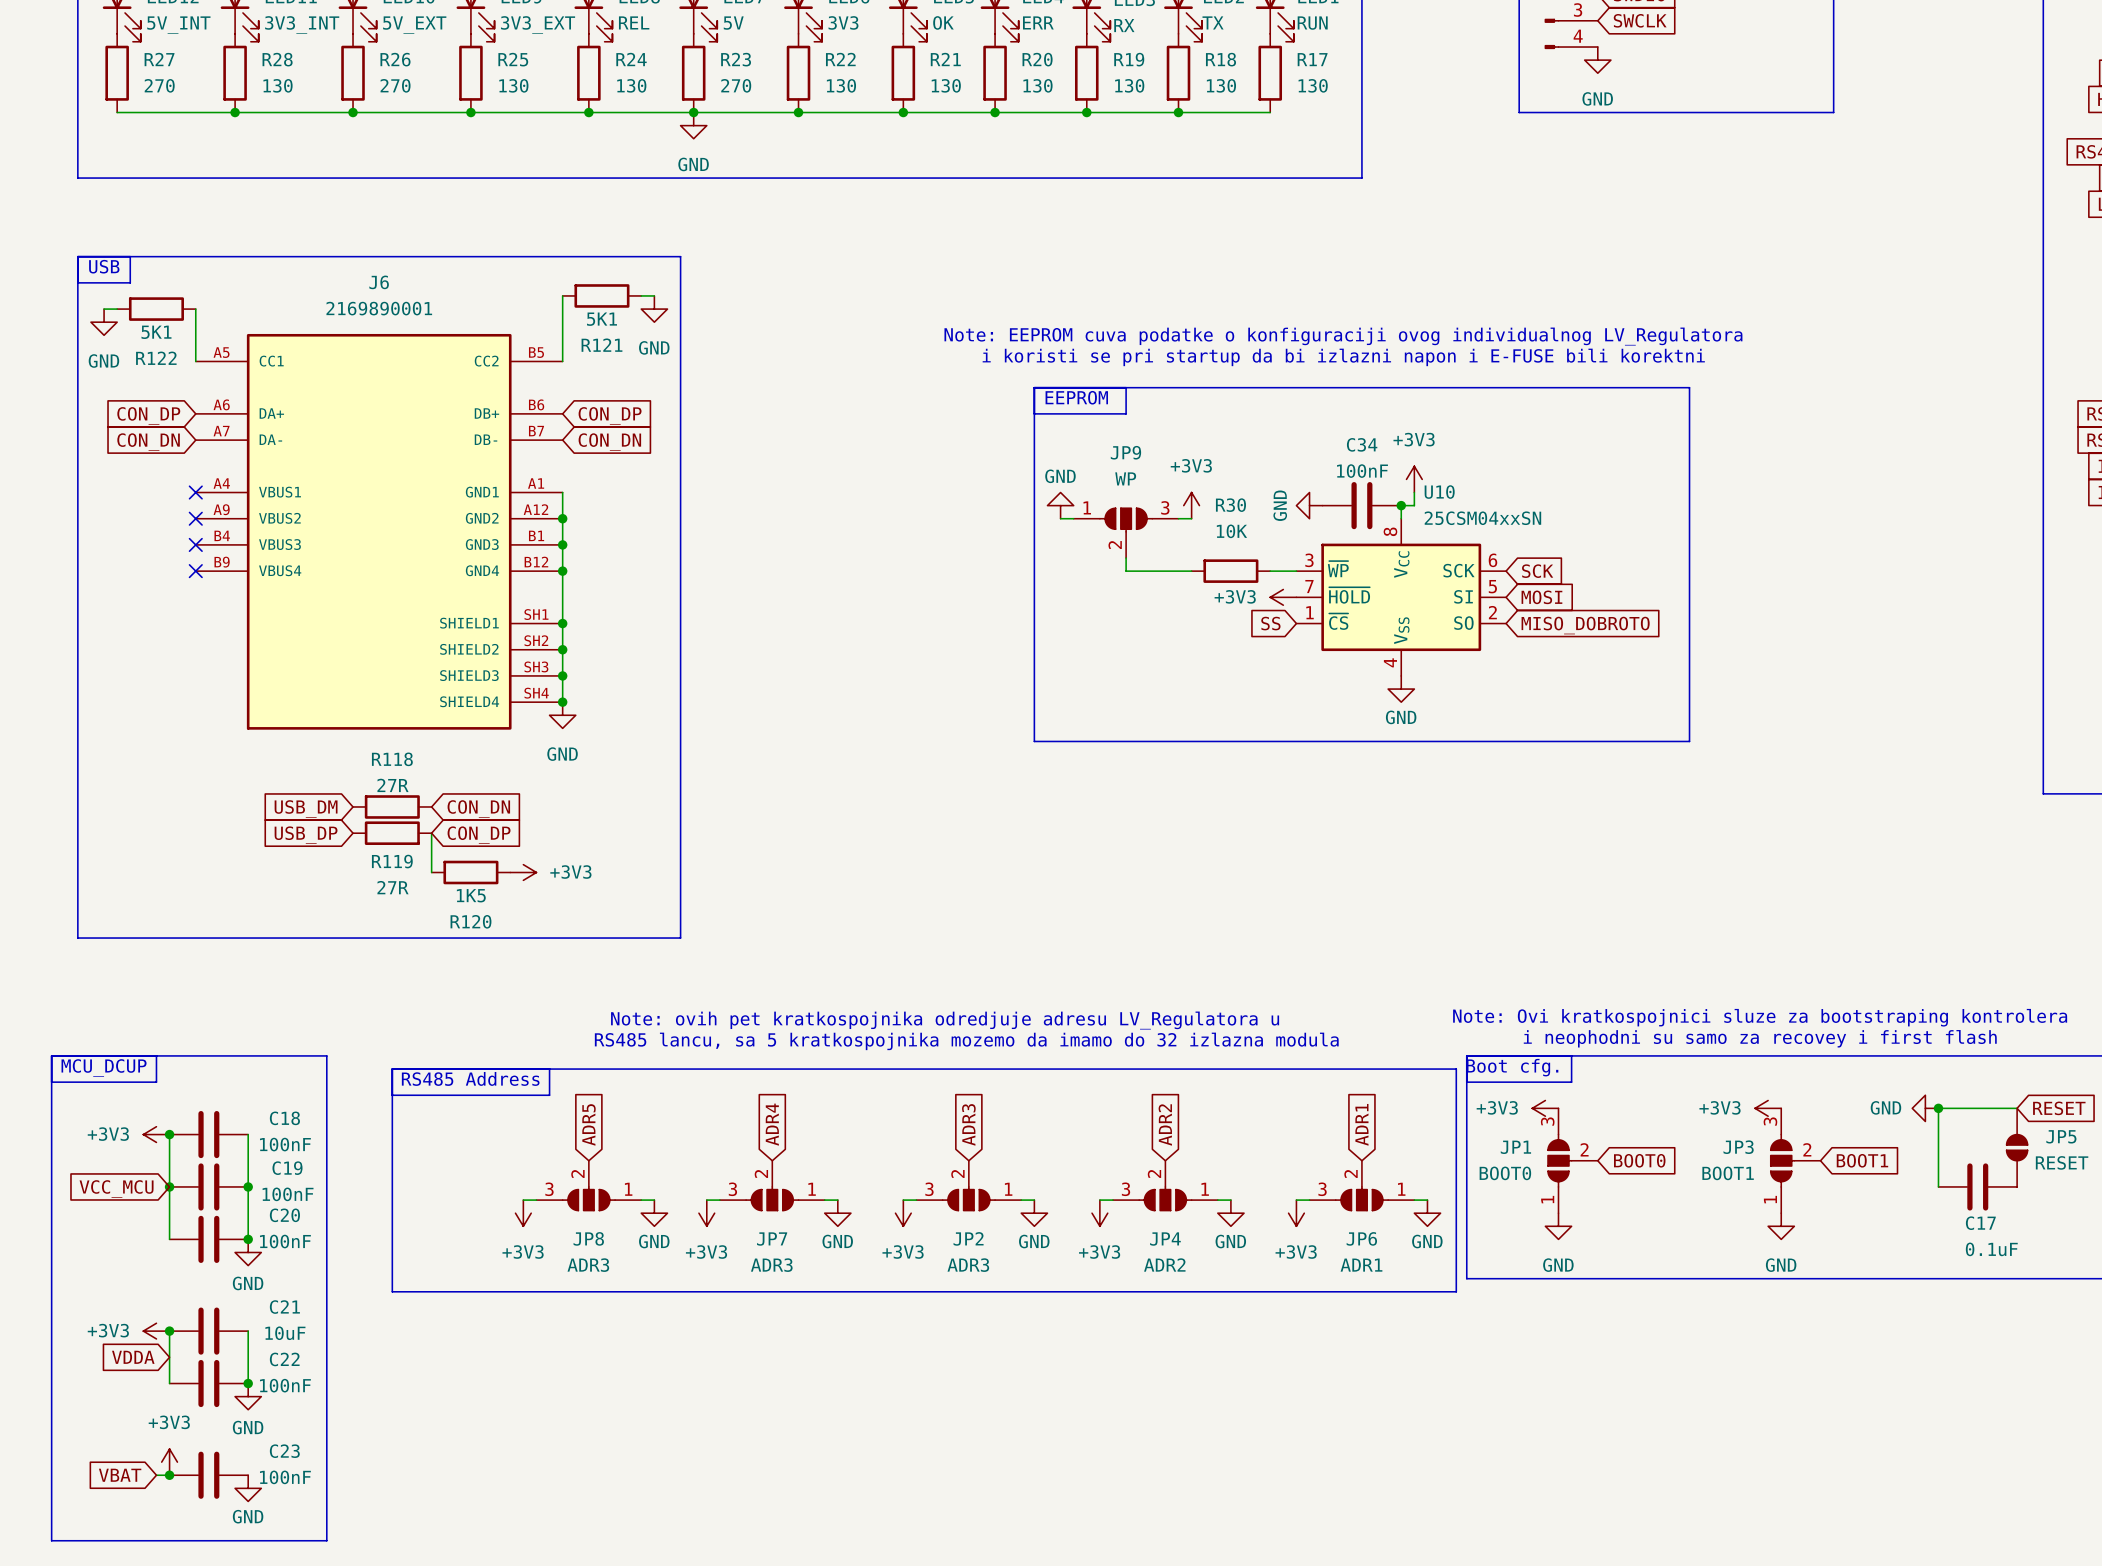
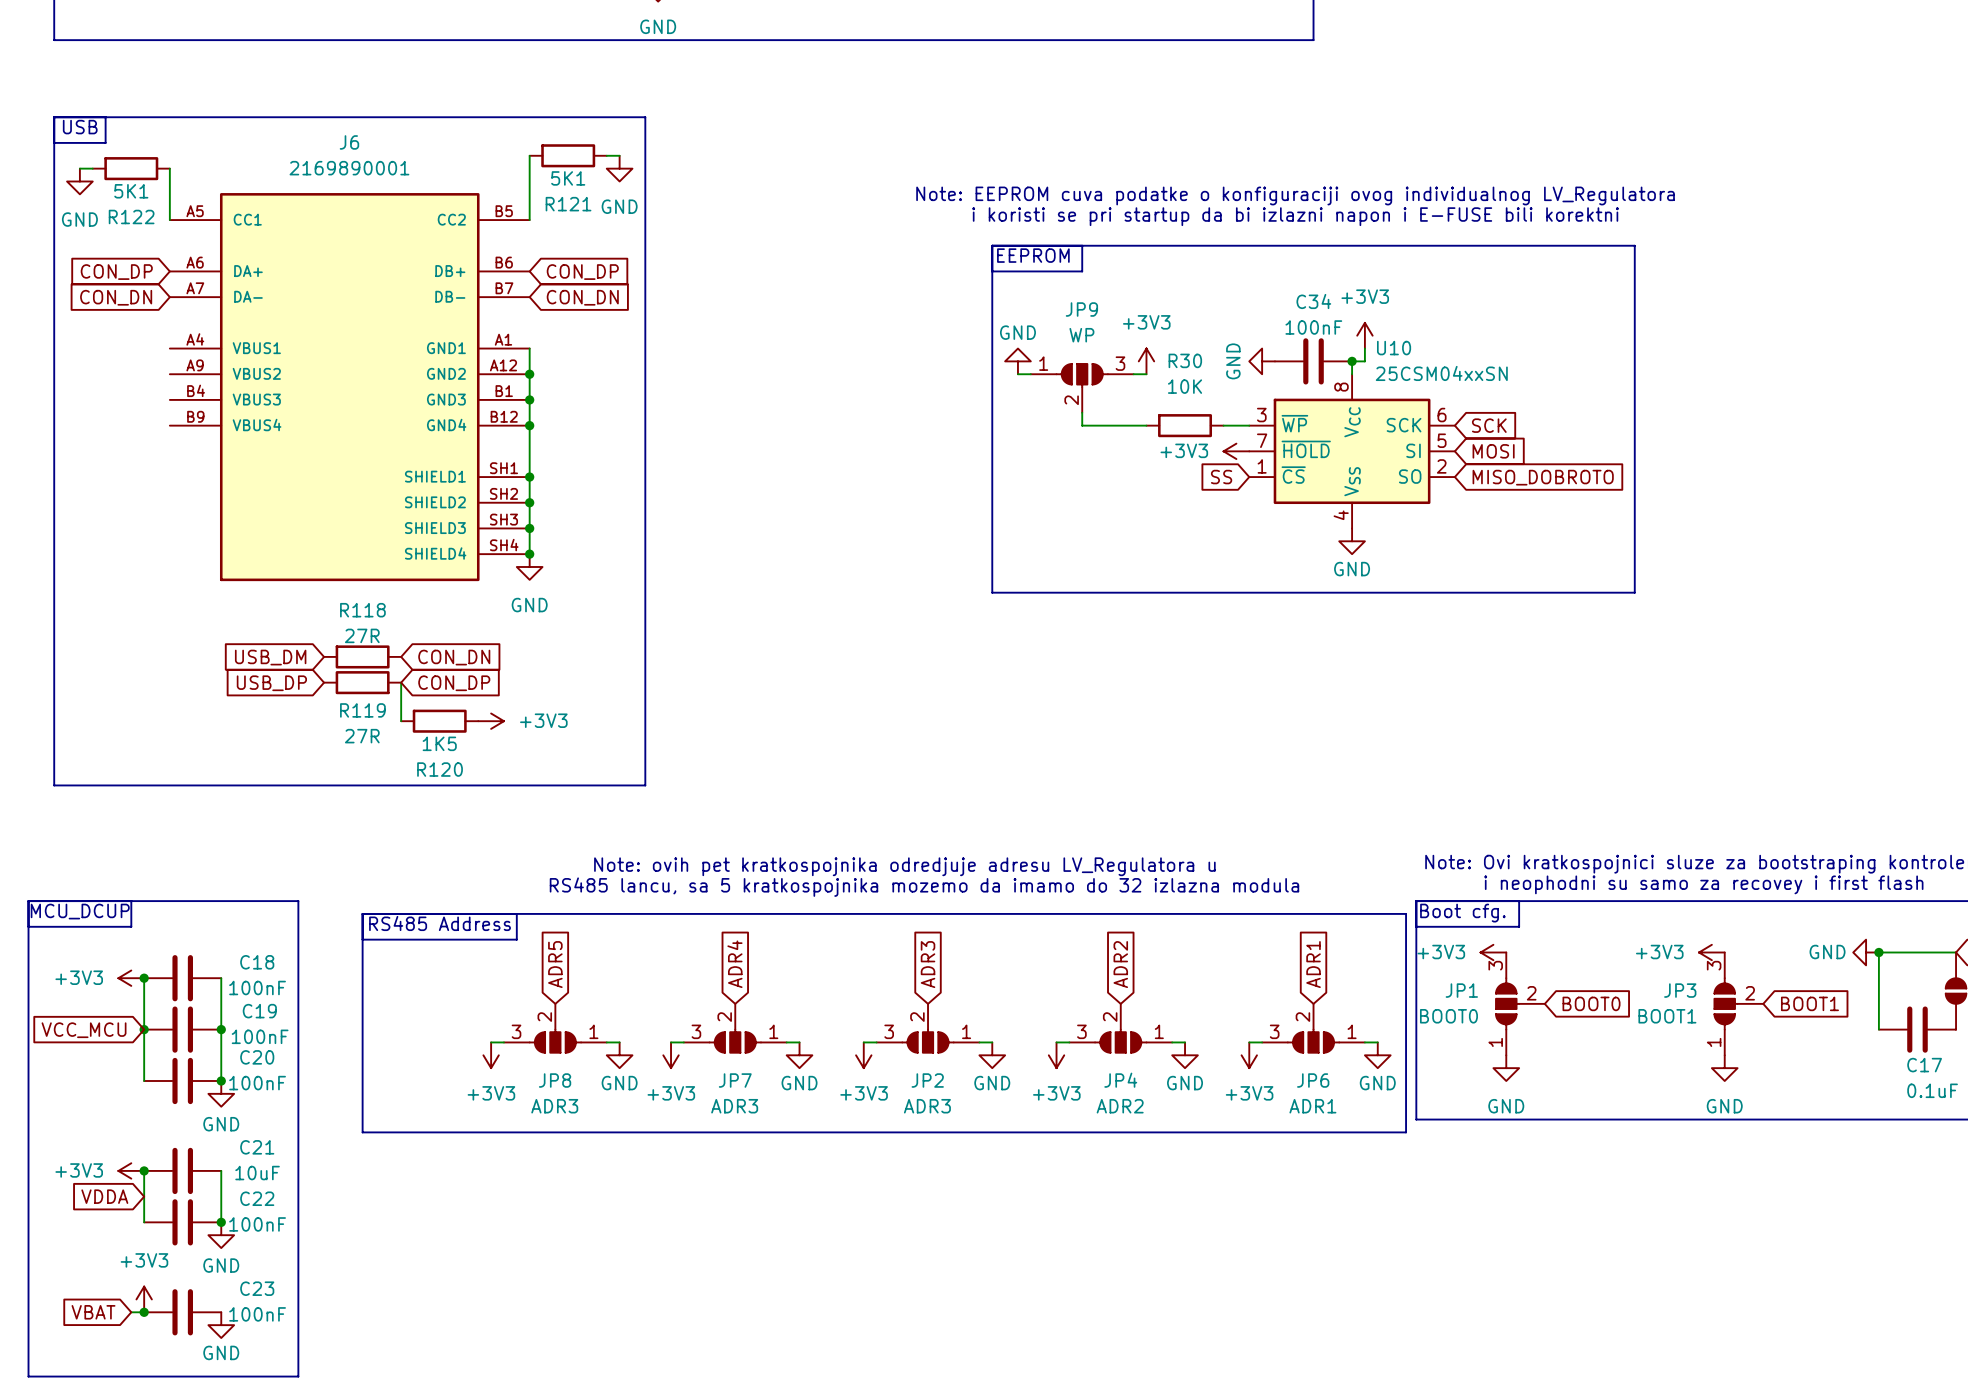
no-connect mark: (195, 492) -> none
no-connect mark: (195, 518) -> none
no-connect mark: (195, 544) -> none
no-connect mark: (195, 571) -> none

